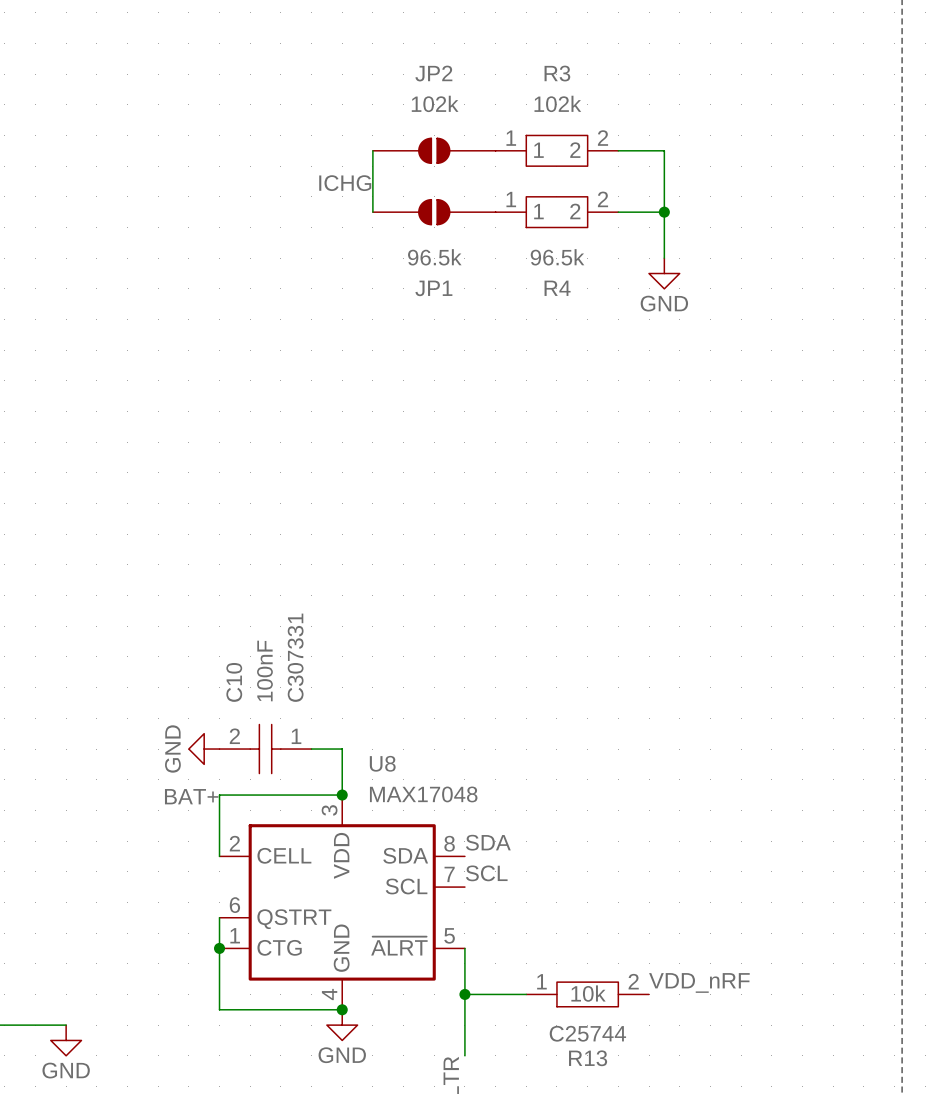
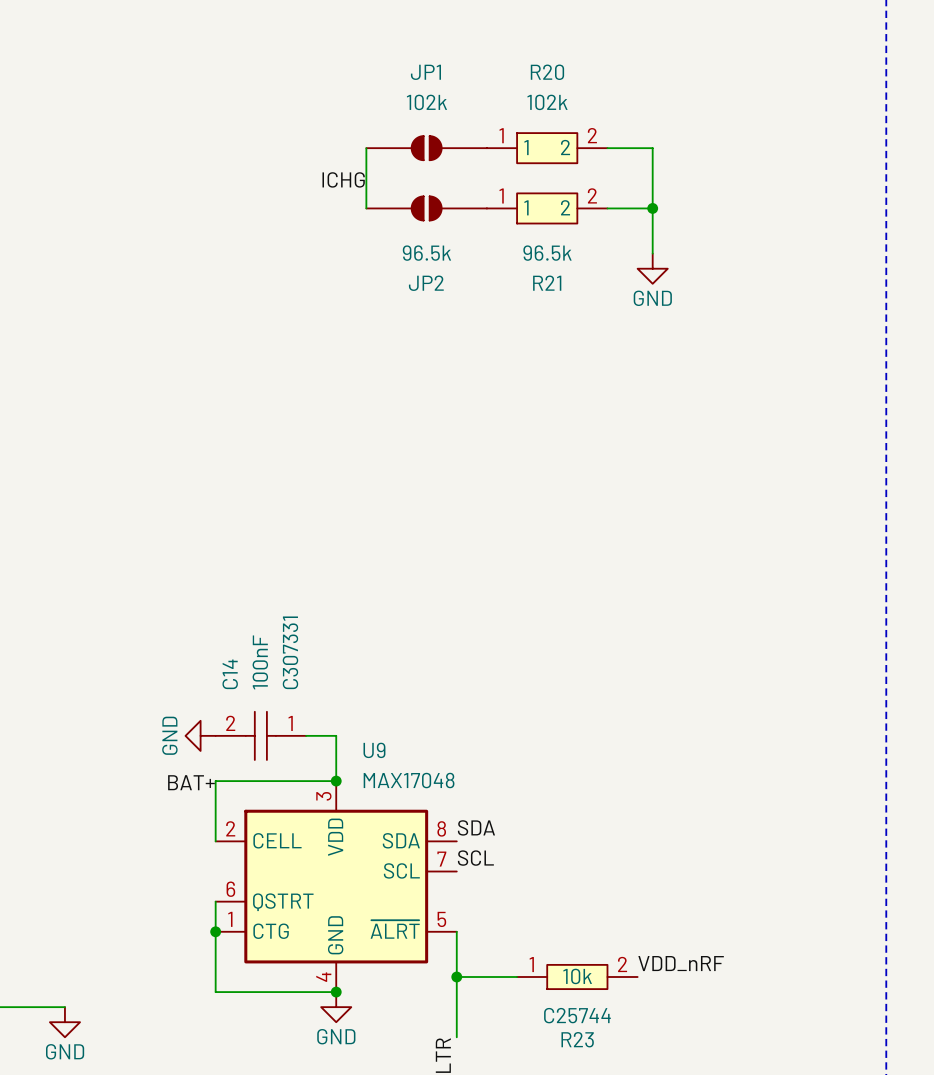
JP2 name: JP2 (433, 73) -> JP1 (425, 72)
R3 name: R3 (557, 73) -> R20 (547, 72)
JP1 name: JP1 (433, 288) -> JP2 (426, 283)
R4 name: R4 (557, 288) -> R21 (547, 283)
C10 name: C10 (234, 682) -> C14 (230, 674)
U8 name: U8 (382, 763) -> U9 (374, 750)
R13 name: R13 (588, 1058) -> R23 (577, 1039)

